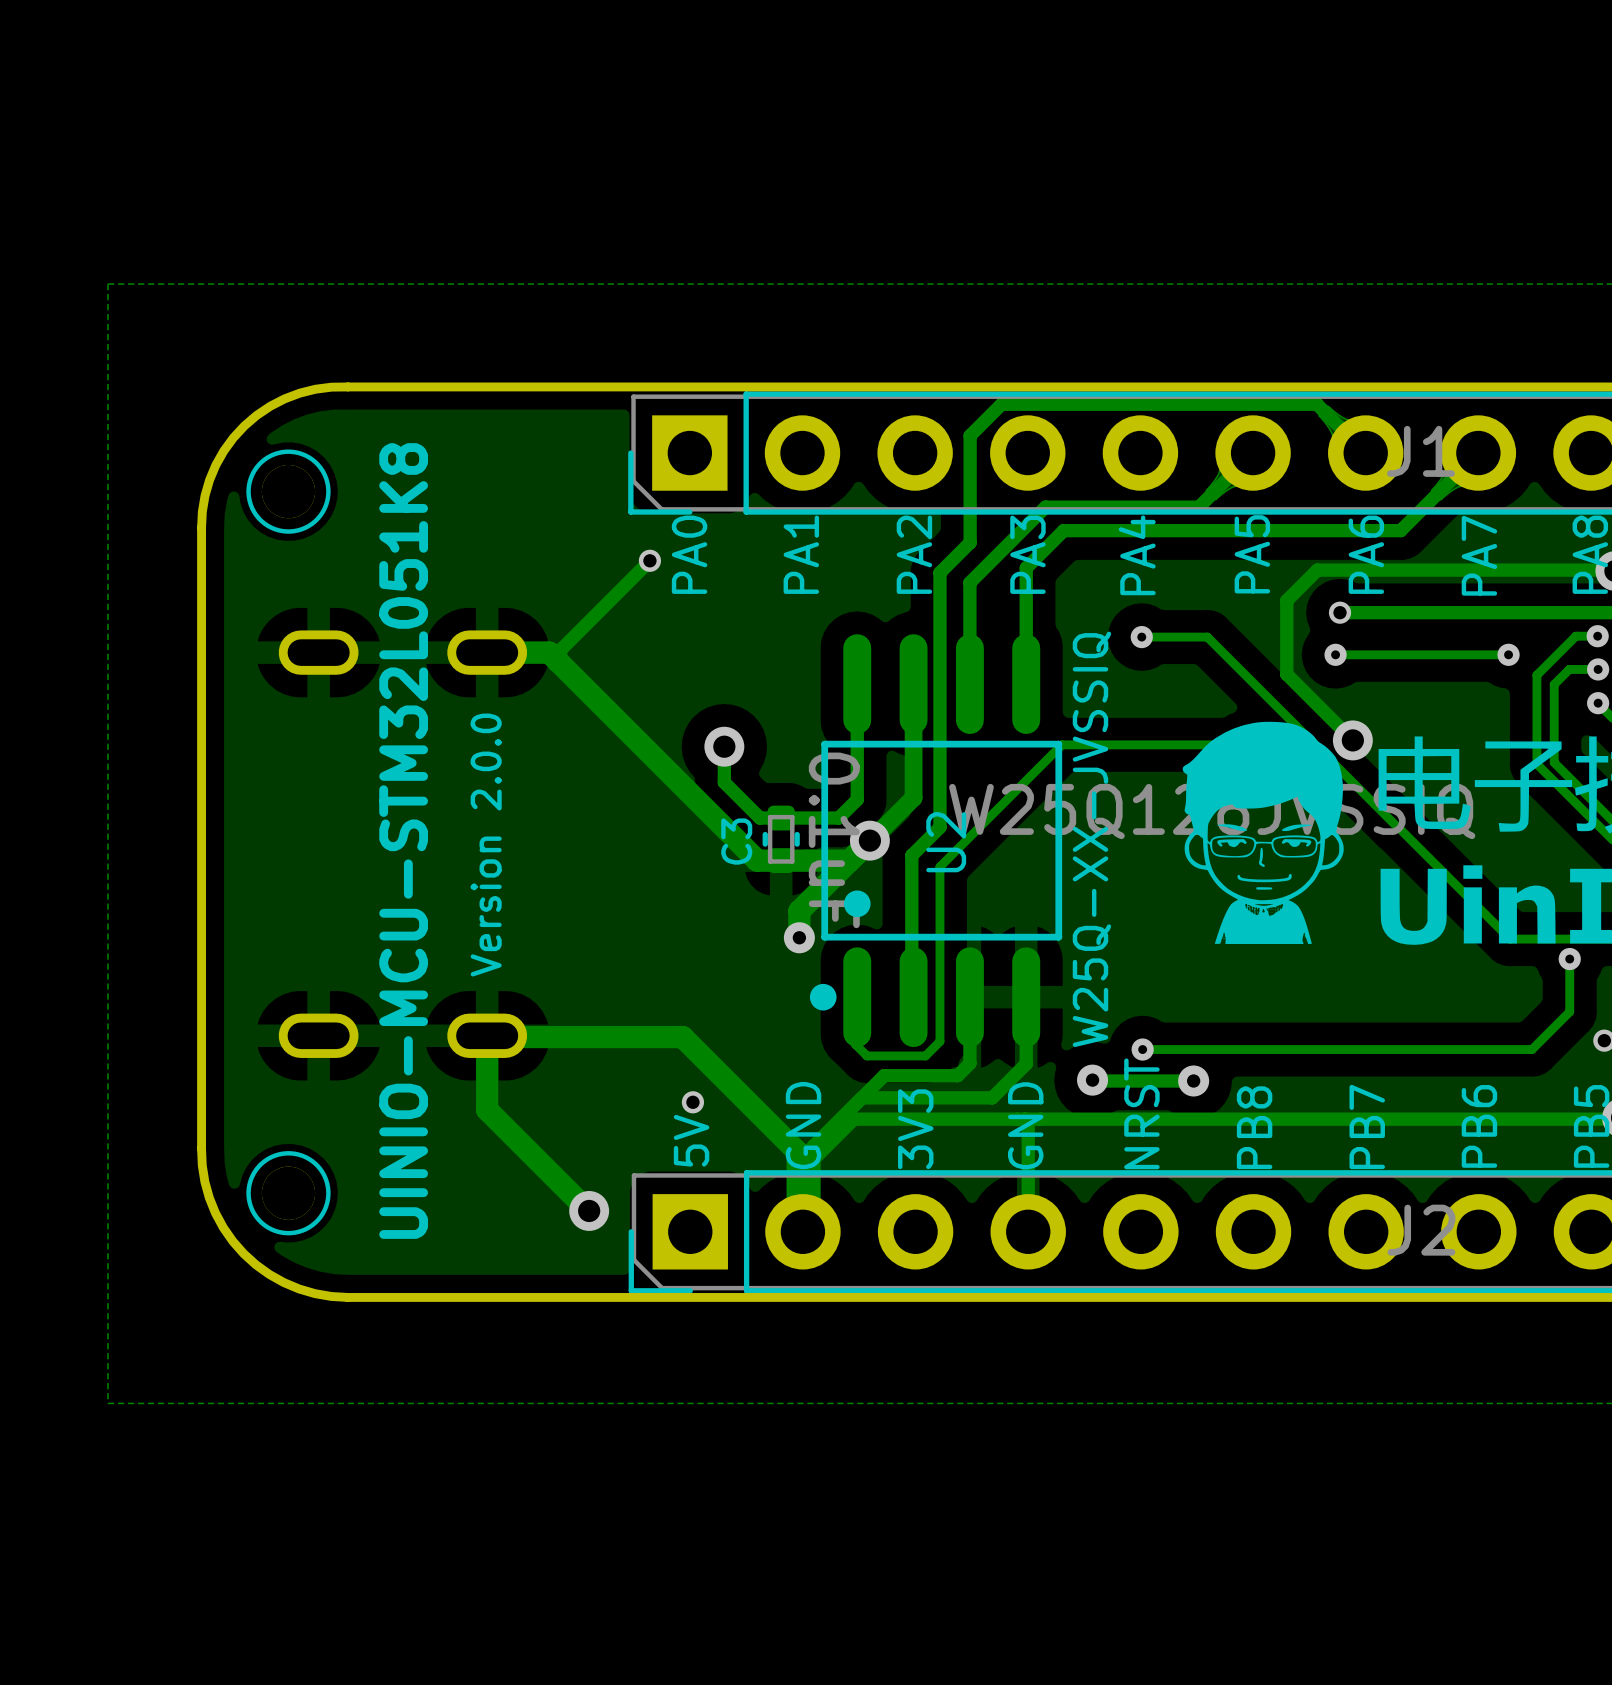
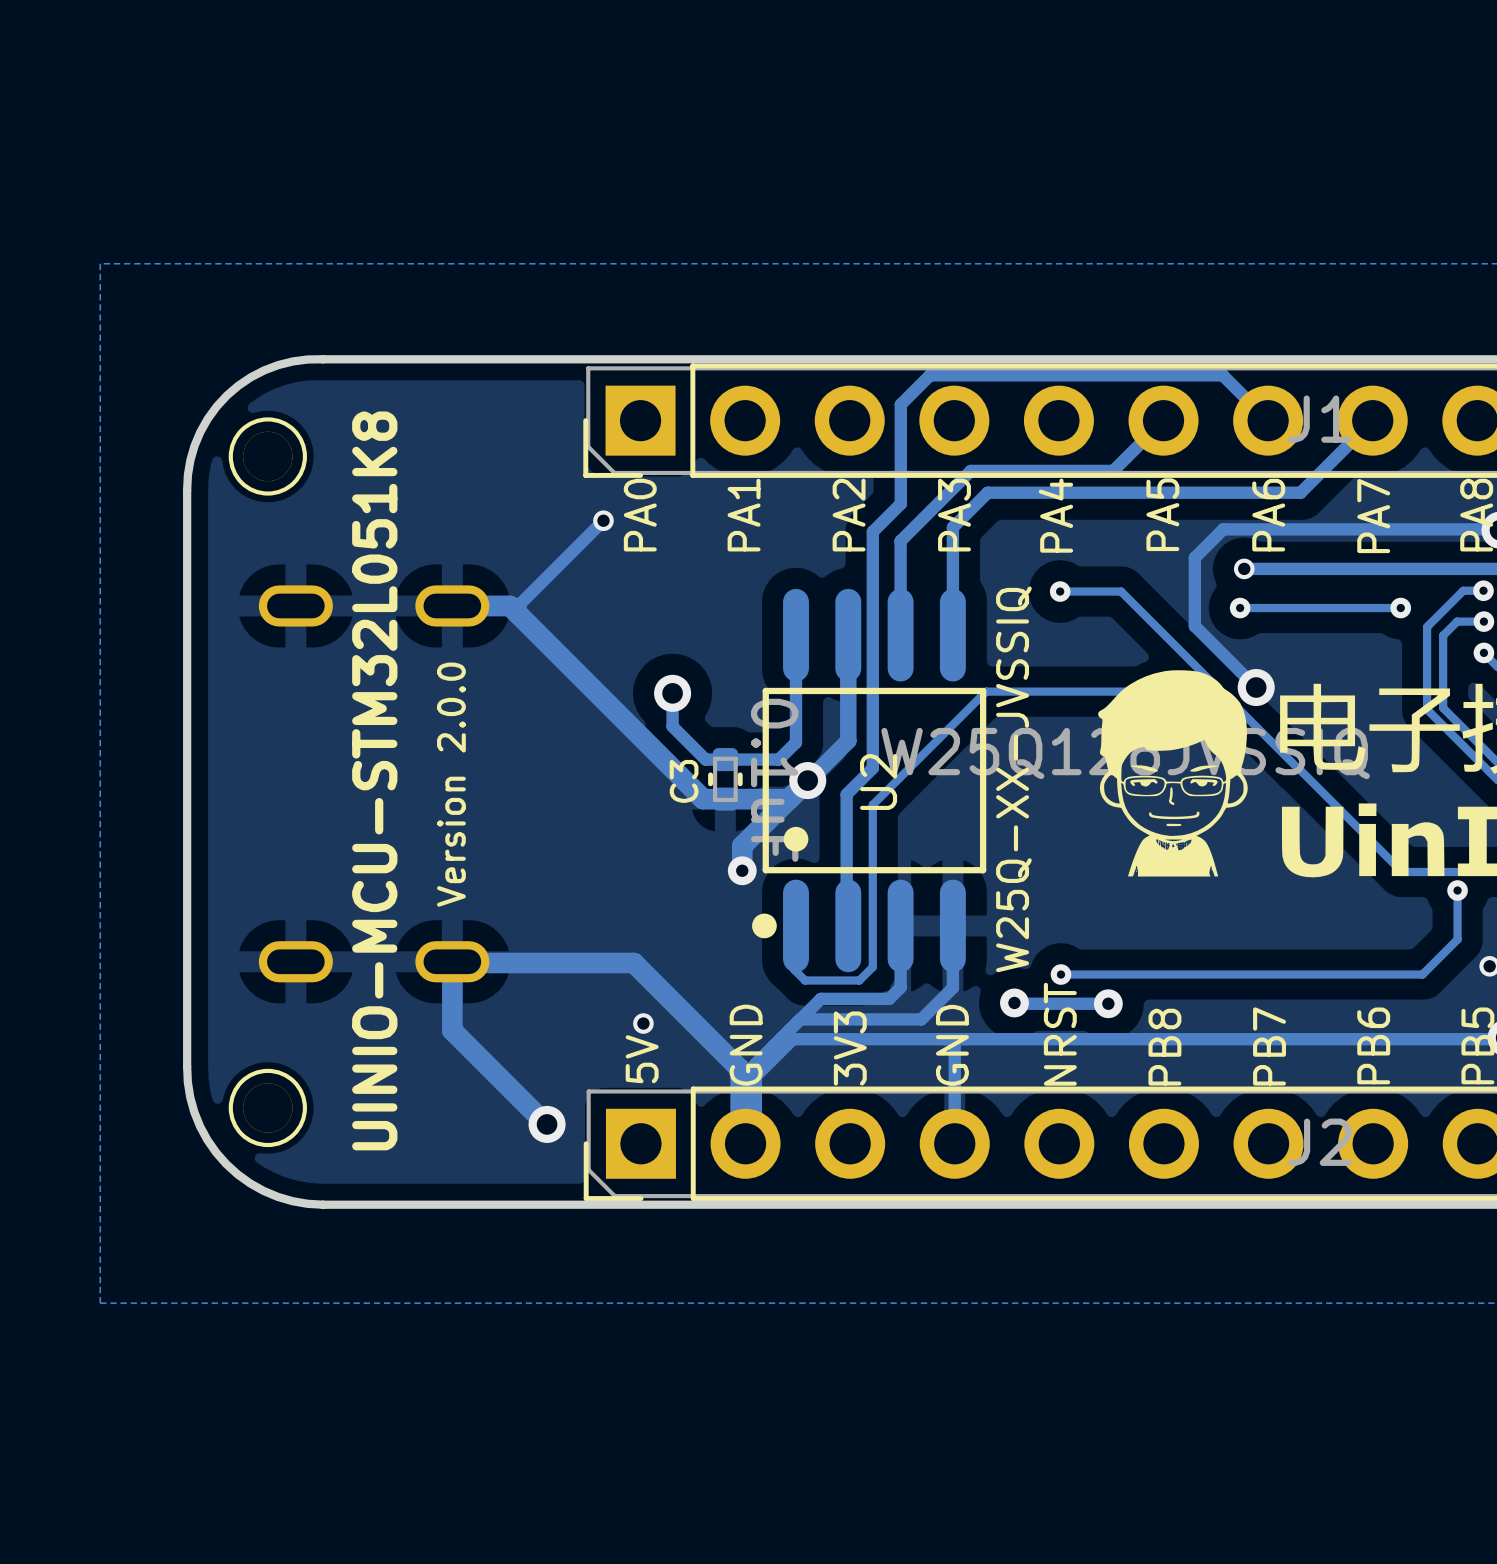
zone outline: (1347, 419) (1328, 405) (1318, 415) (1332, 434) -> none
zone outline: (1219, 471) (1206, 490) (1215, 500) (1234, 486) -> none
zone outline: (1445, 471) (1431, 490) (1440, 500) (1460, 486) -> none

